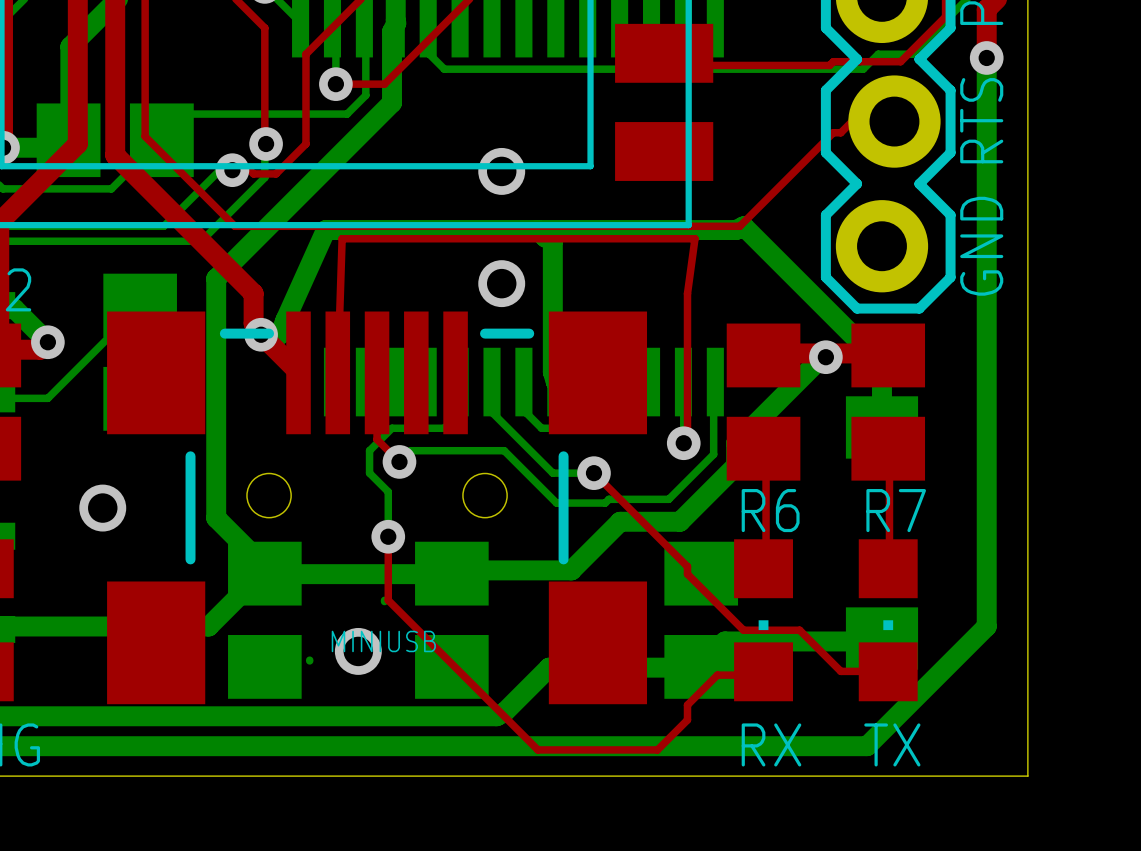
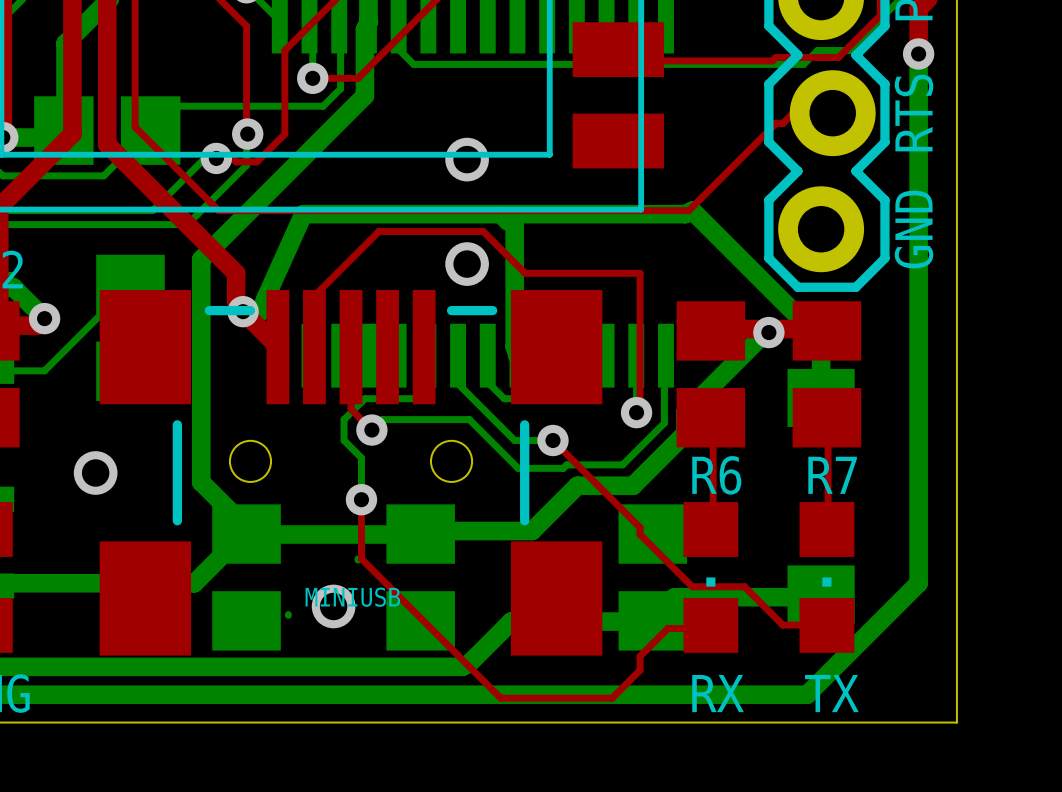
top track: (687, 293) (694, 238) (342, 238) (339, 316) -> (640, 273) (525, 273) (483, 231) (378, 231) (316, 294) (314, 347)

